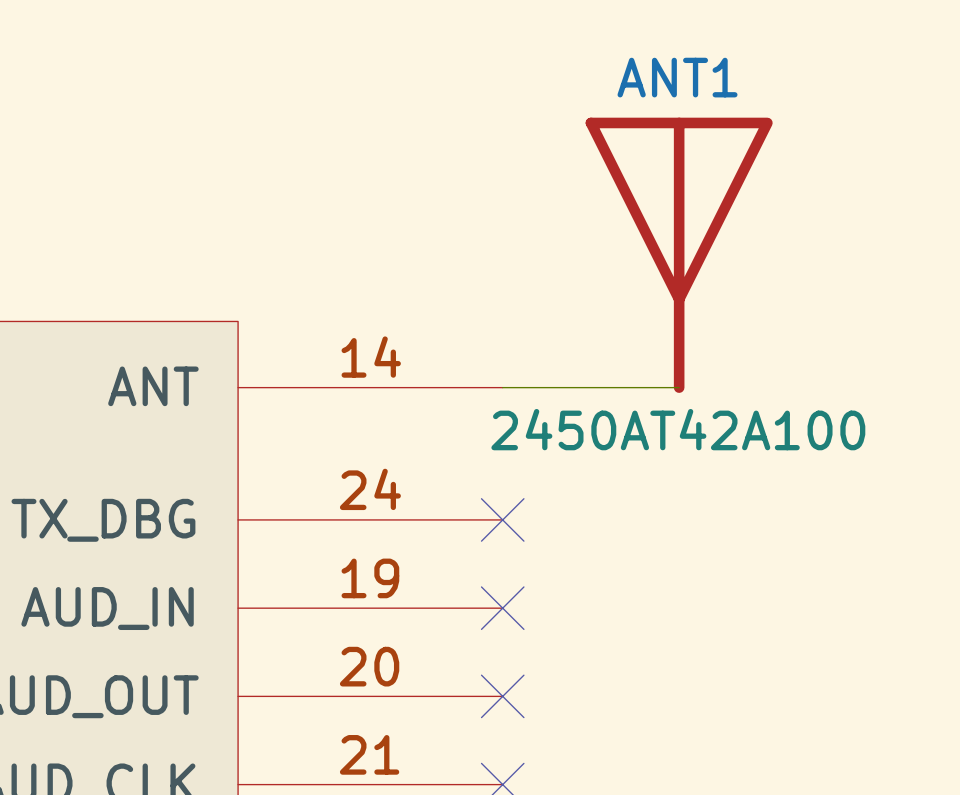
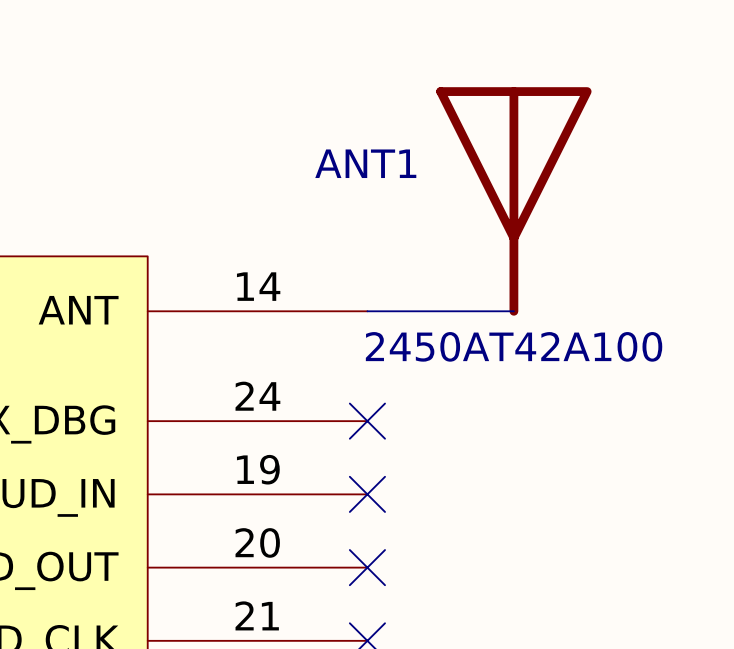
ANT1 name position: ANT1 (677, 77) -> ANT1 (365, 163)

